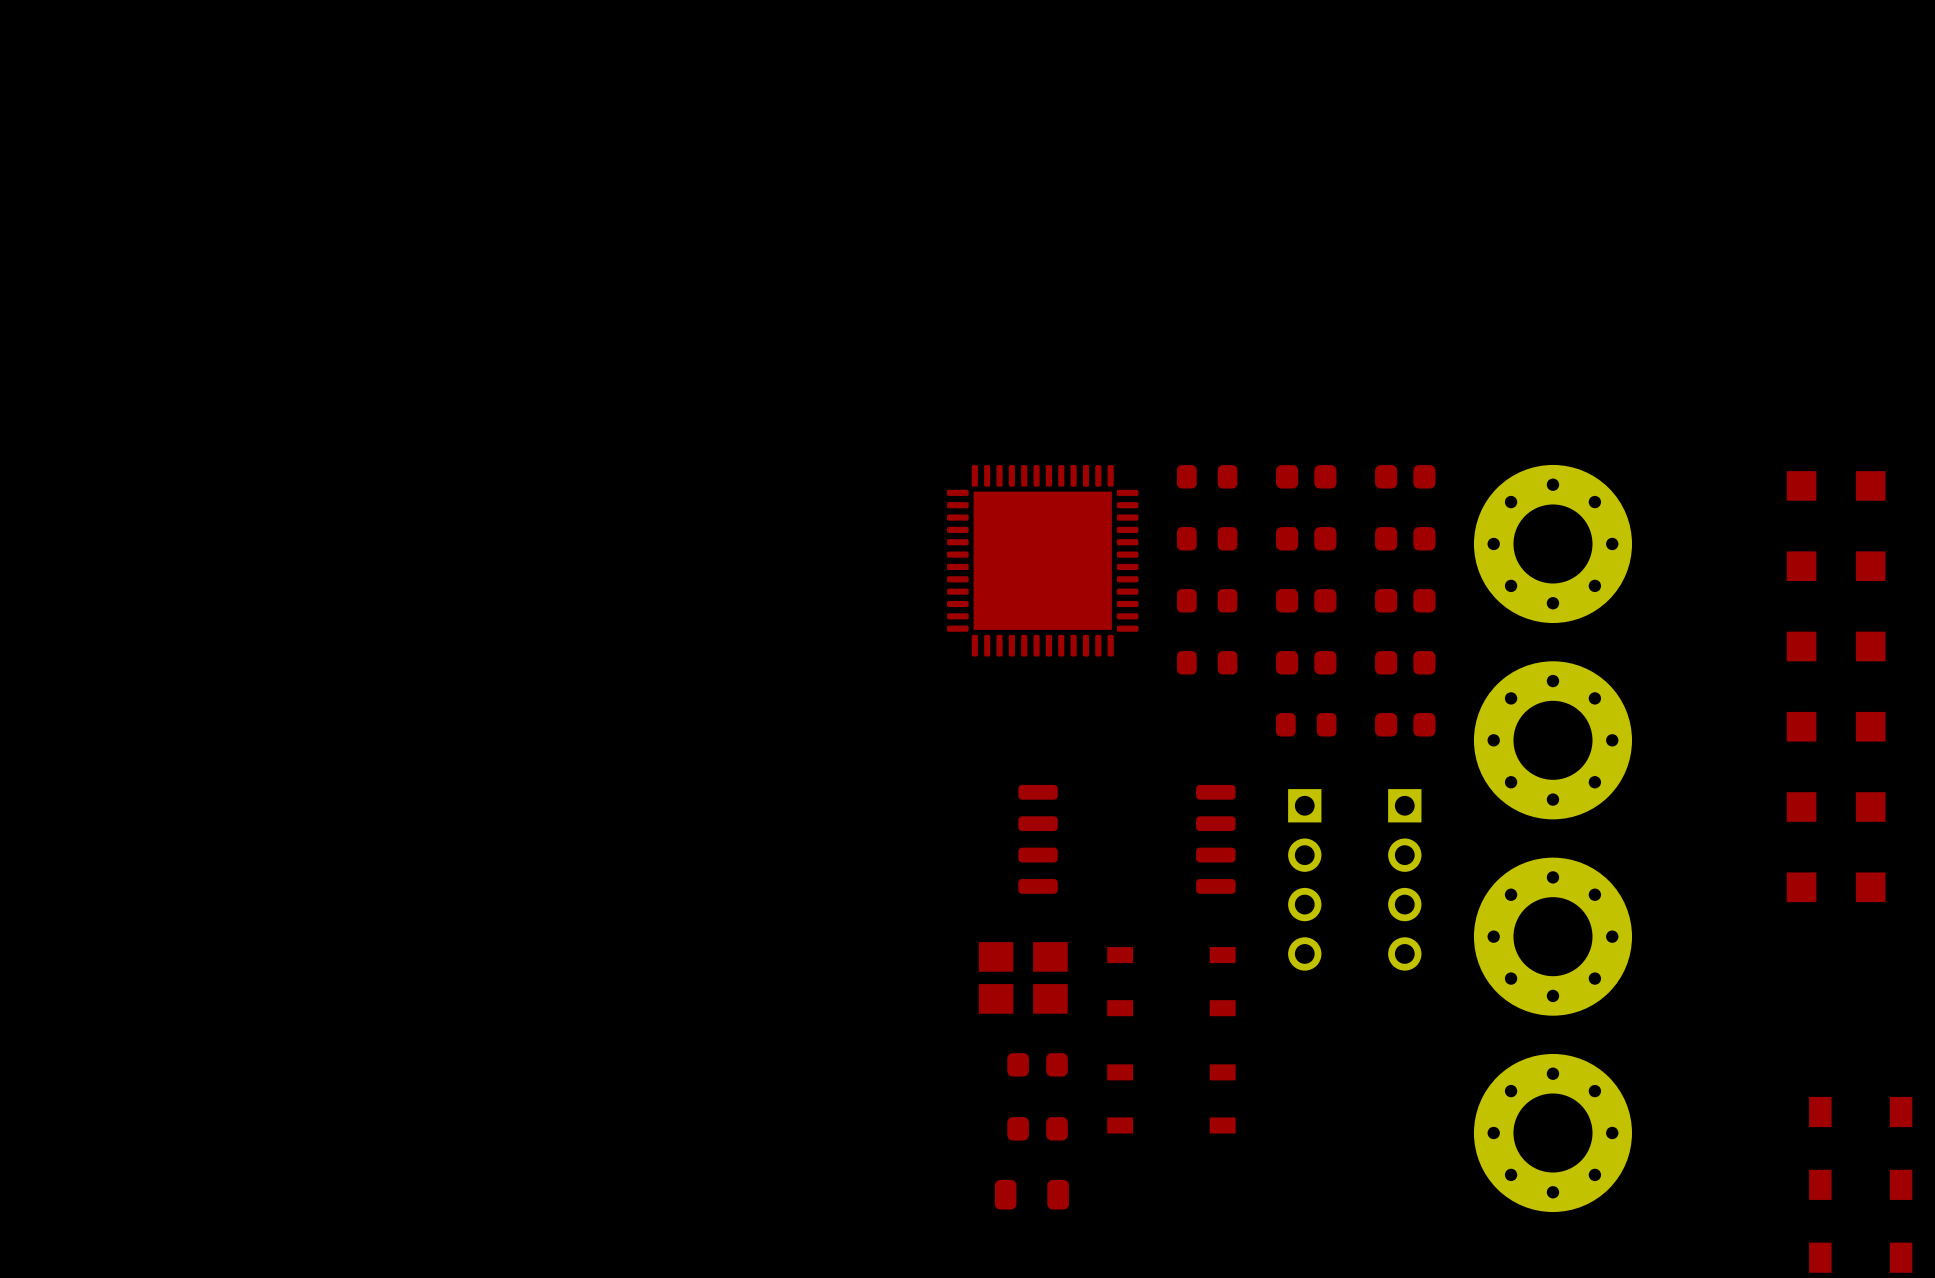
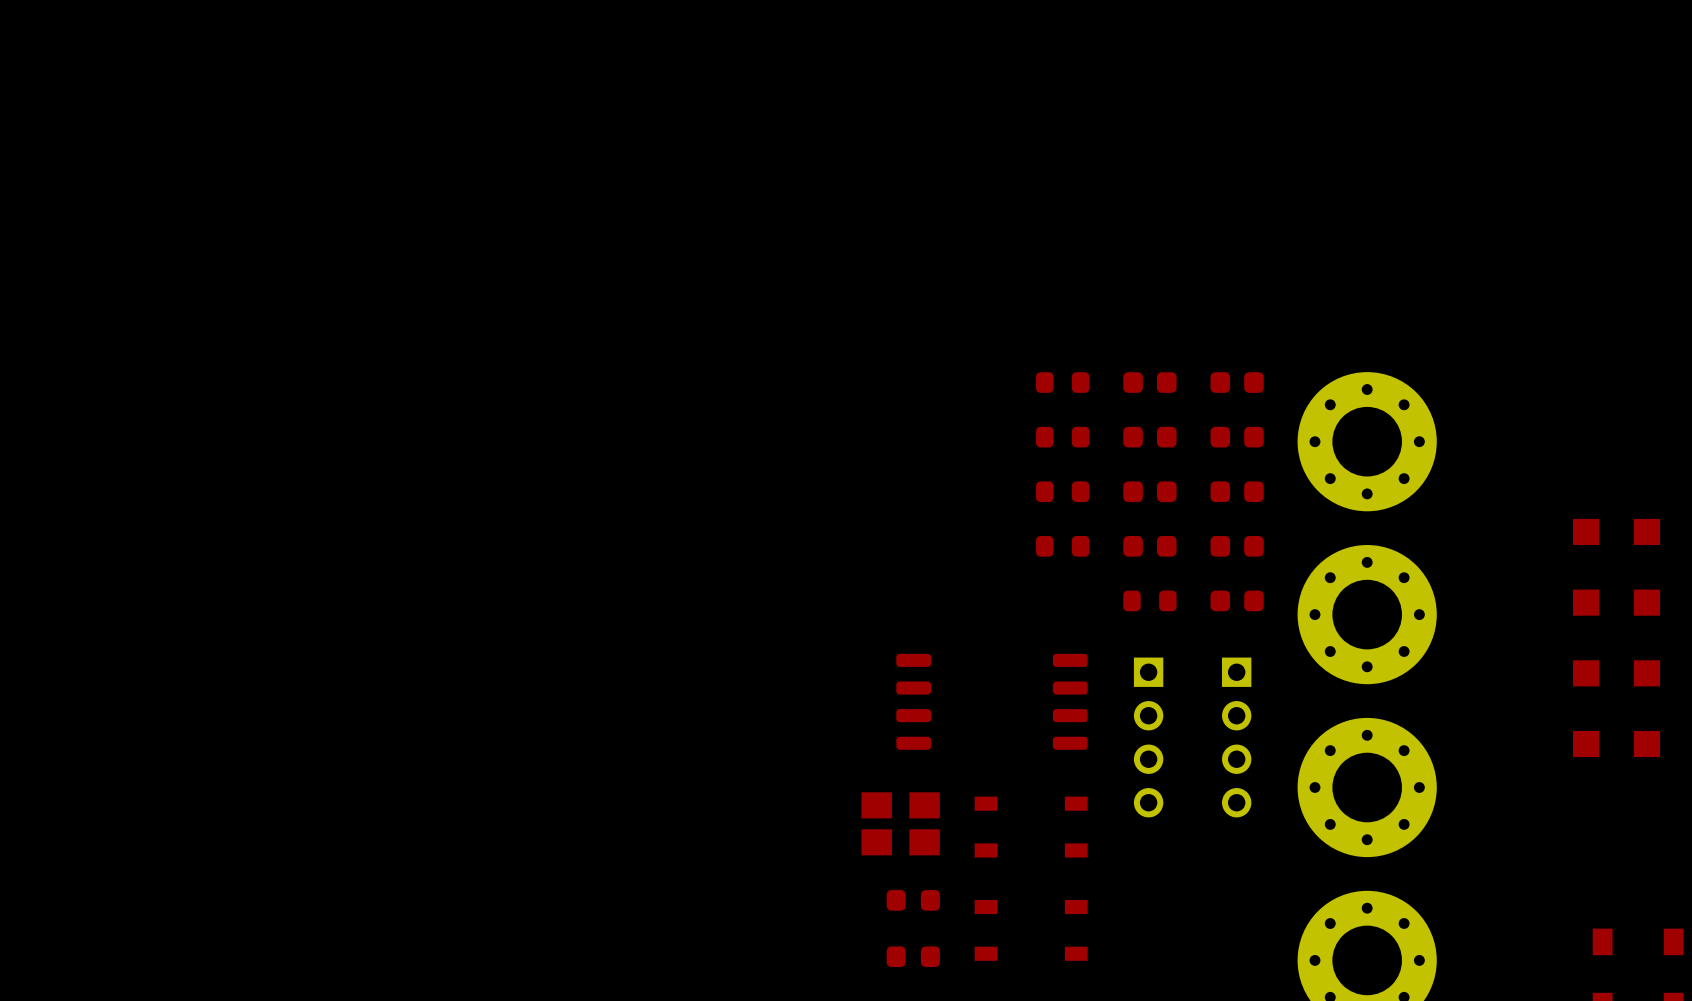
part: (1836, 485) -> none
part: (1042, 560) -> none
part: (1836, 566) -> none

